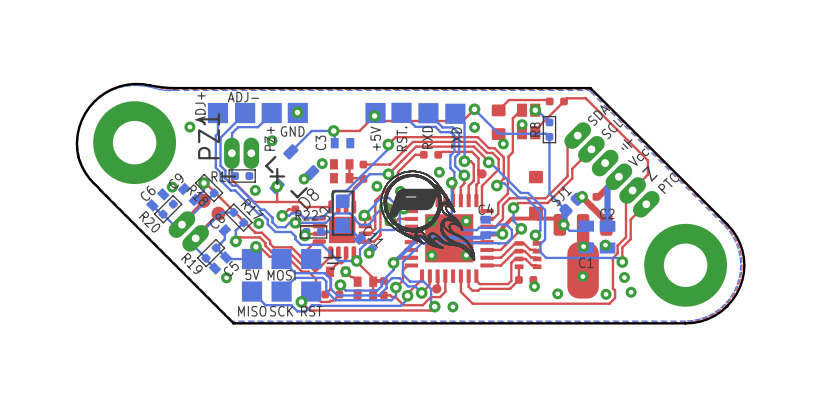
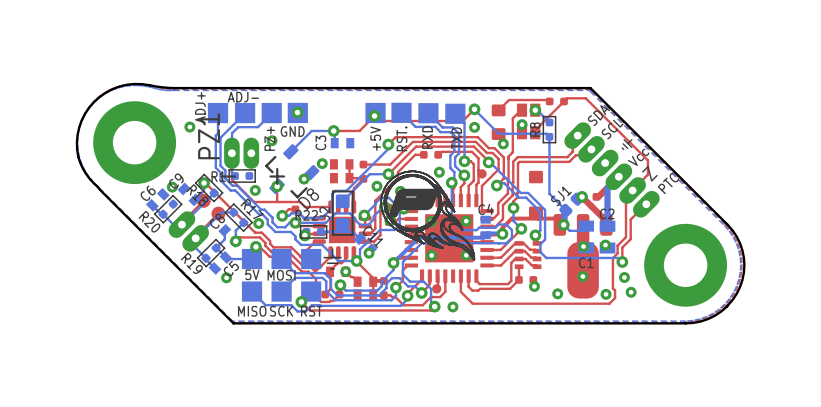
top track: (572, 140) (567, 143) (567, 176) (545, 198) (509, 198) -> (572, 140) (572, 151) (567, 157) (517, 157) (513, 161) (512, 195) (509, 198)
top track: (591, 149) (572, 168) (572, 178) (547, 203) (518, 203) (513, 207) -> (591, 149) (585, 155) (575, 155) (569, 161) (519, 161) (518, 163) (517, 197) (513, 201) (513, 208)

